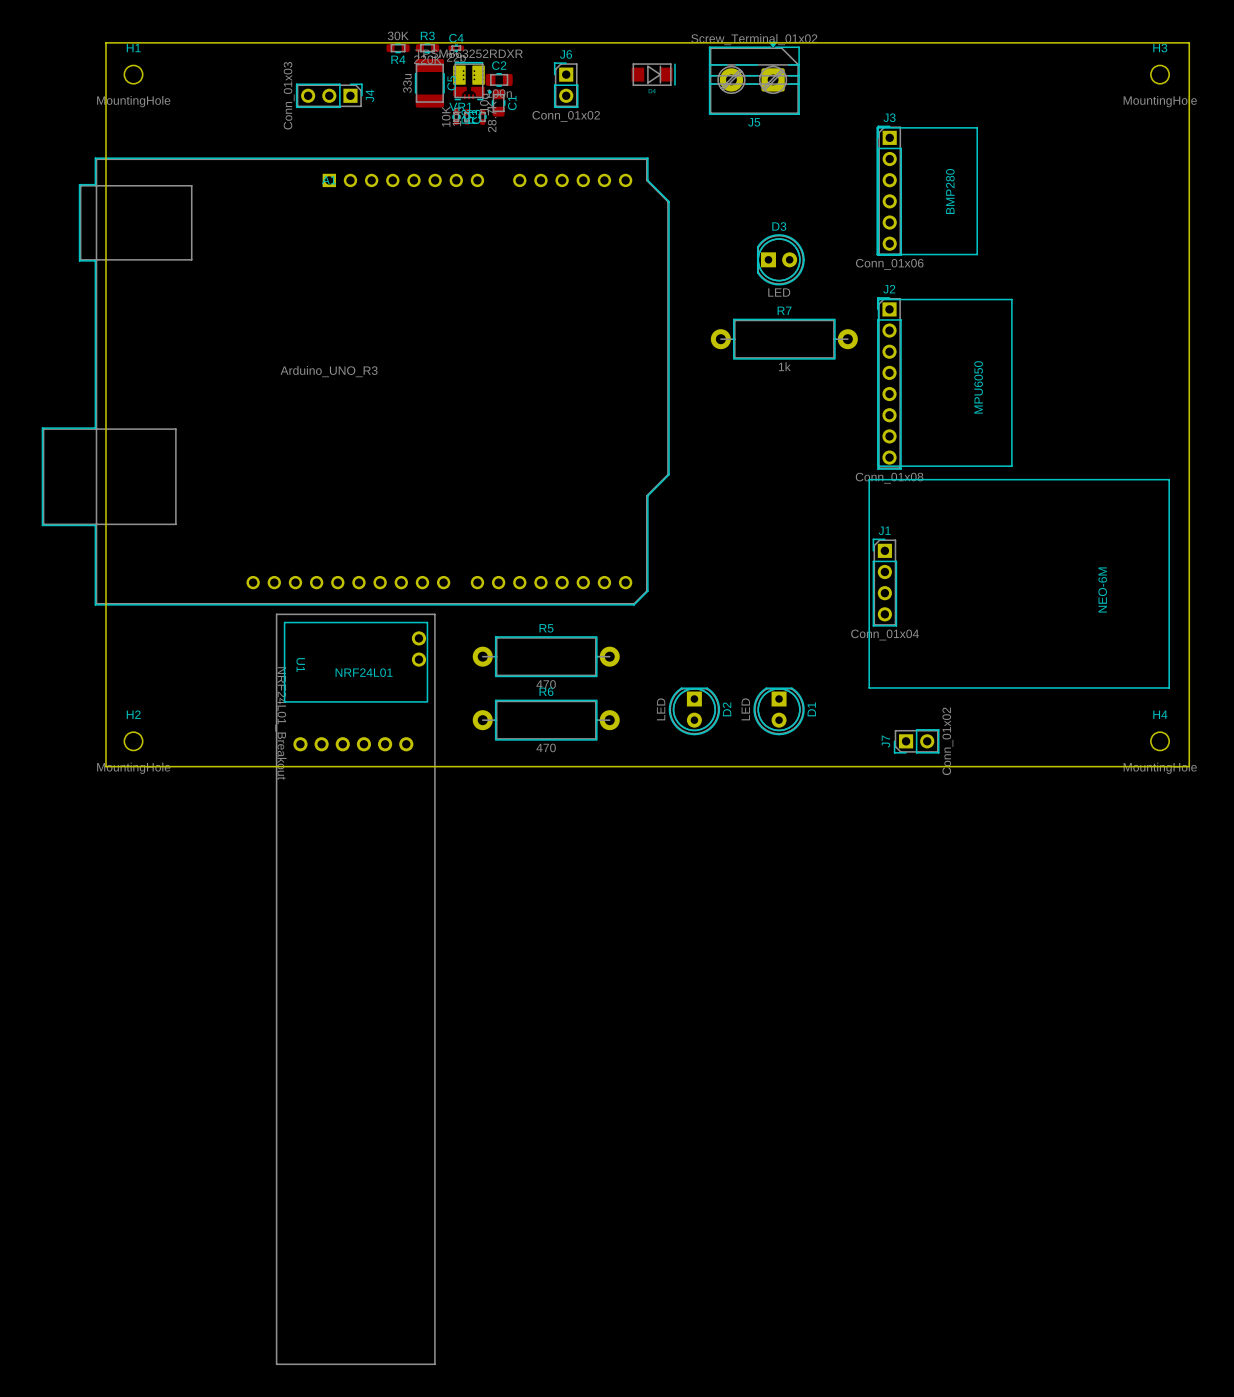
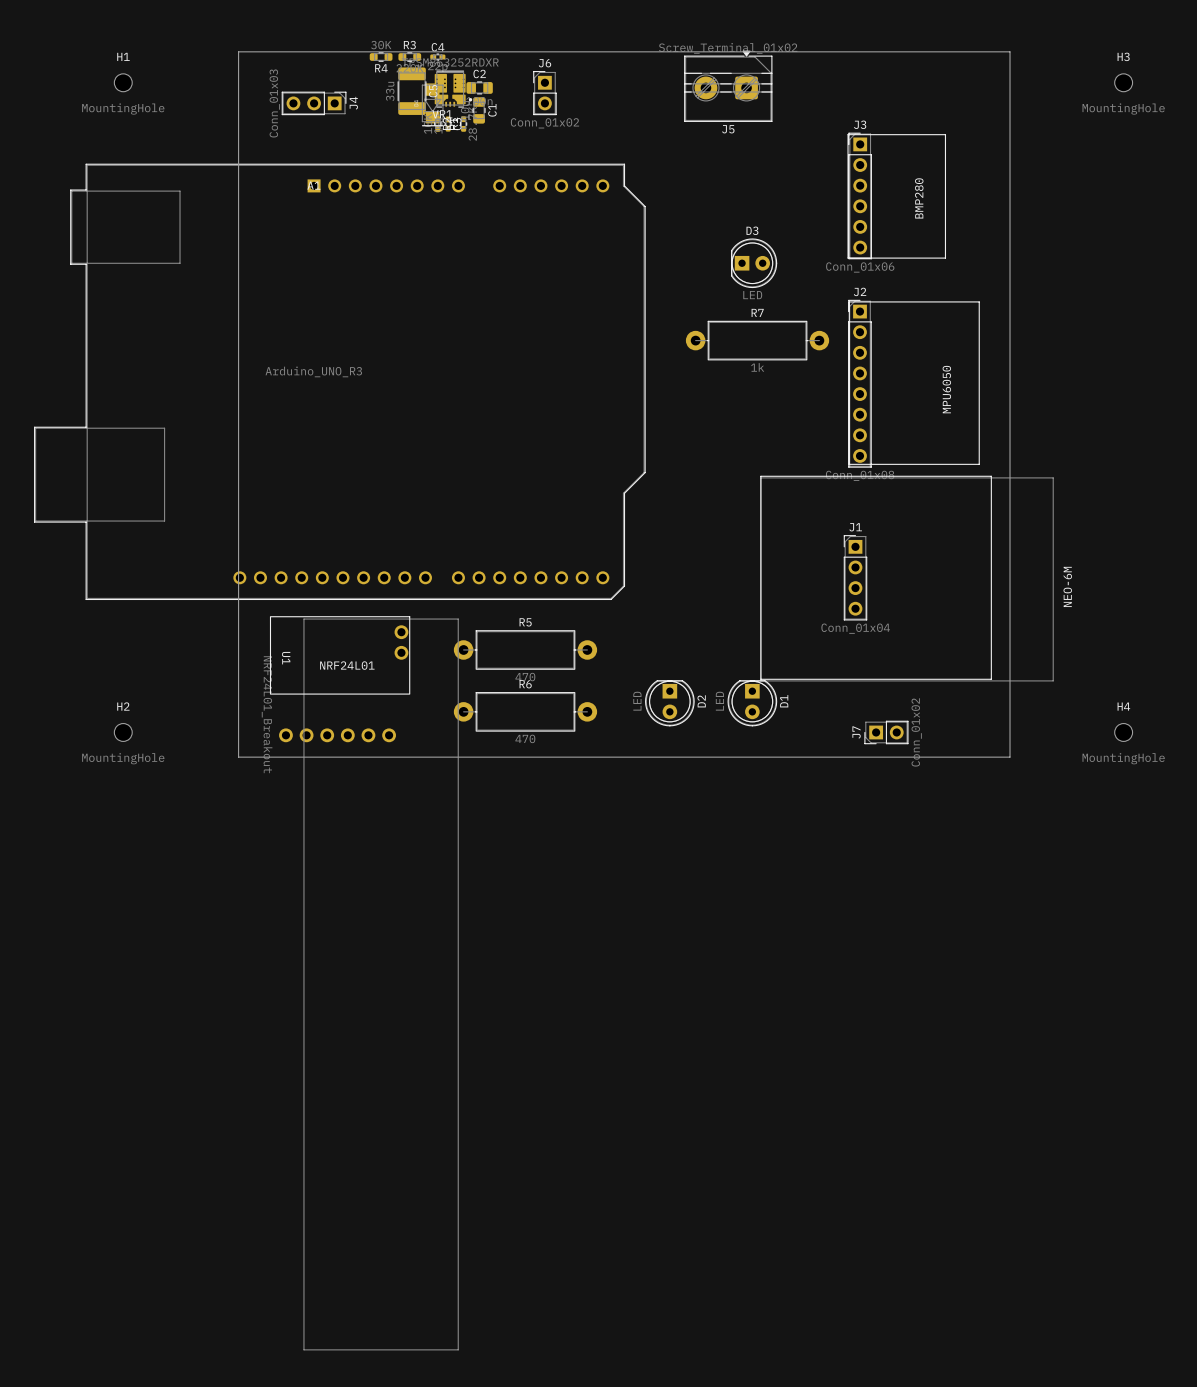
board edge: (251, 42) (106, 42) (106, 766) (251, 766) -> (238, 51) (238, 757)
board edge: (1043, 42) (1189, 42) (1189, 766) (1043, 766) -> (1010, 51) (1010, 757)
part rotation: 0° (653, 74) -> 90° clockwise (432, 104)
part position: (653, 74) -> (432, 104)
line: none -> (760, 476) (991, 476) (991, 679) (760, 679) (760, 476)
line: (869, 479) (1169, 479) (1169, 687) (869, 687) (869, 479) -> none
line: none -> (760, 477) (1053, 477) (1053, 680) (760, 680) (760, 477)
line: (276, 614) (434, 614) (434, 1364) (276, 1364) (276, 614) -> (303, 619) (458, 619) (458, 1349) (303, 1349) (303, 619)

